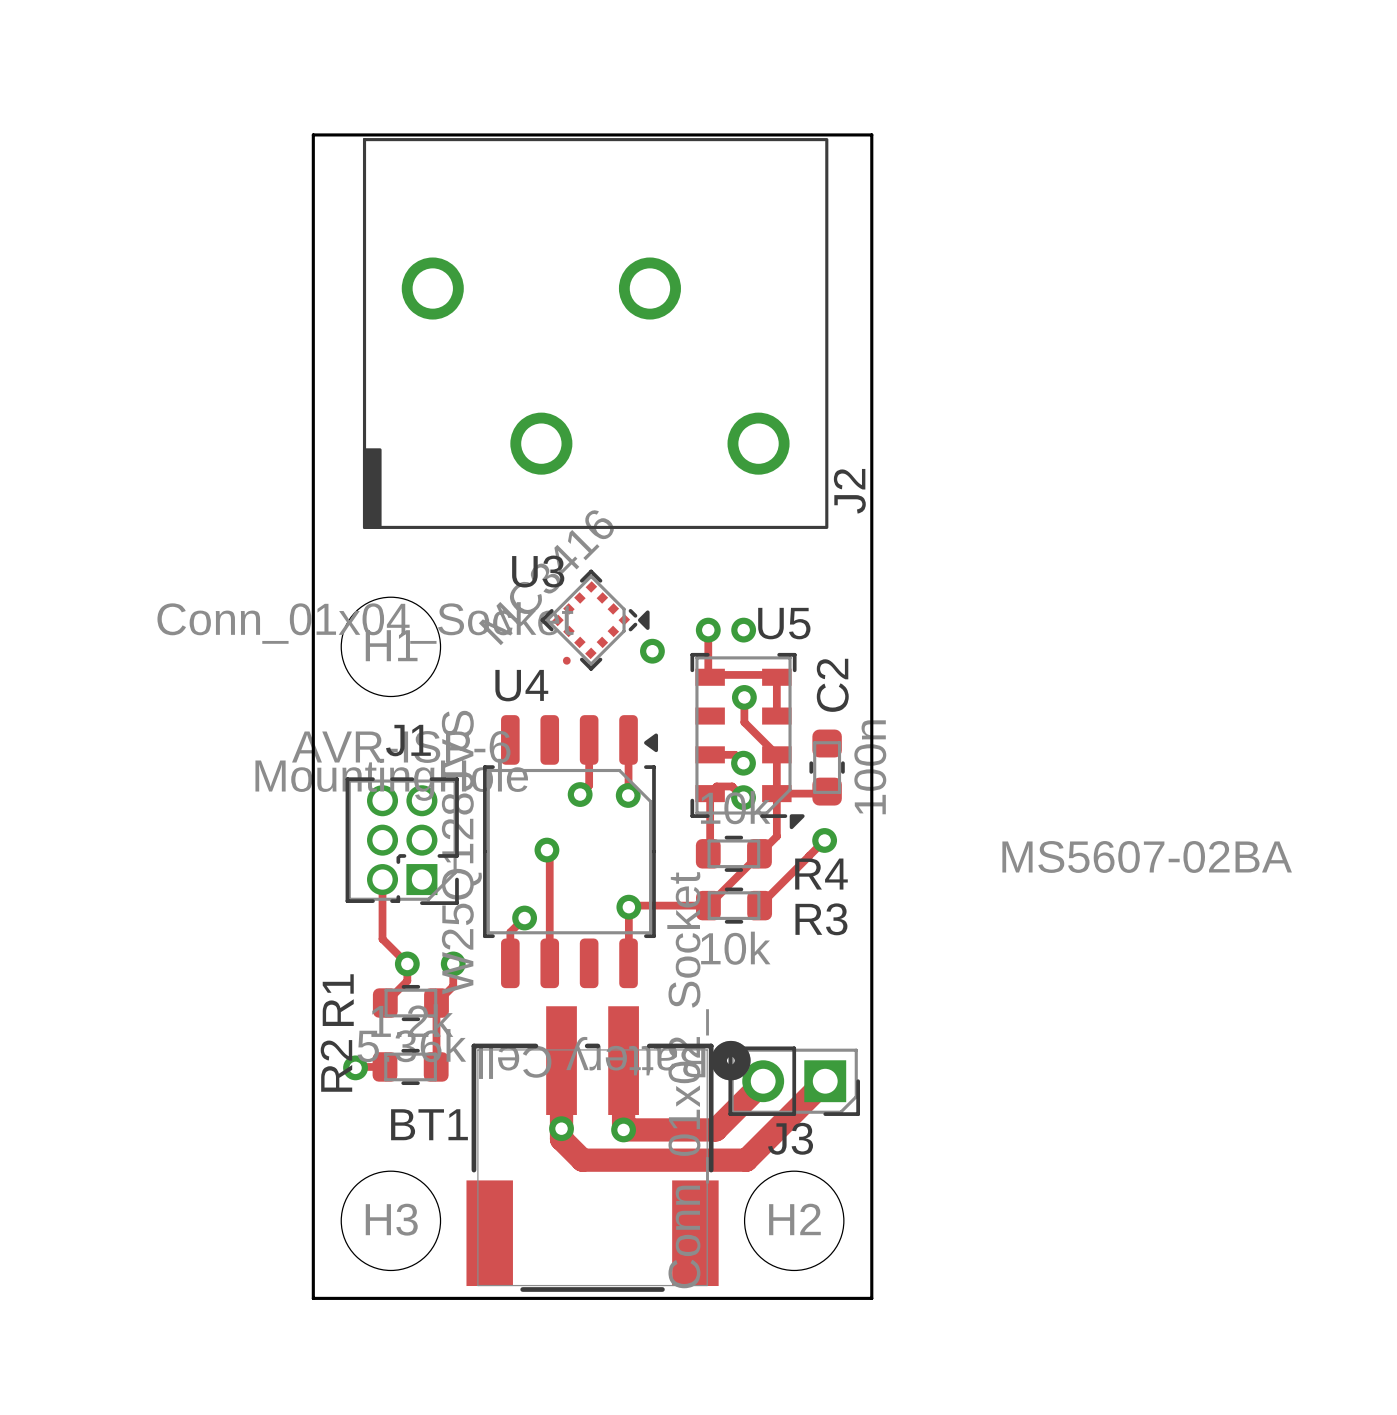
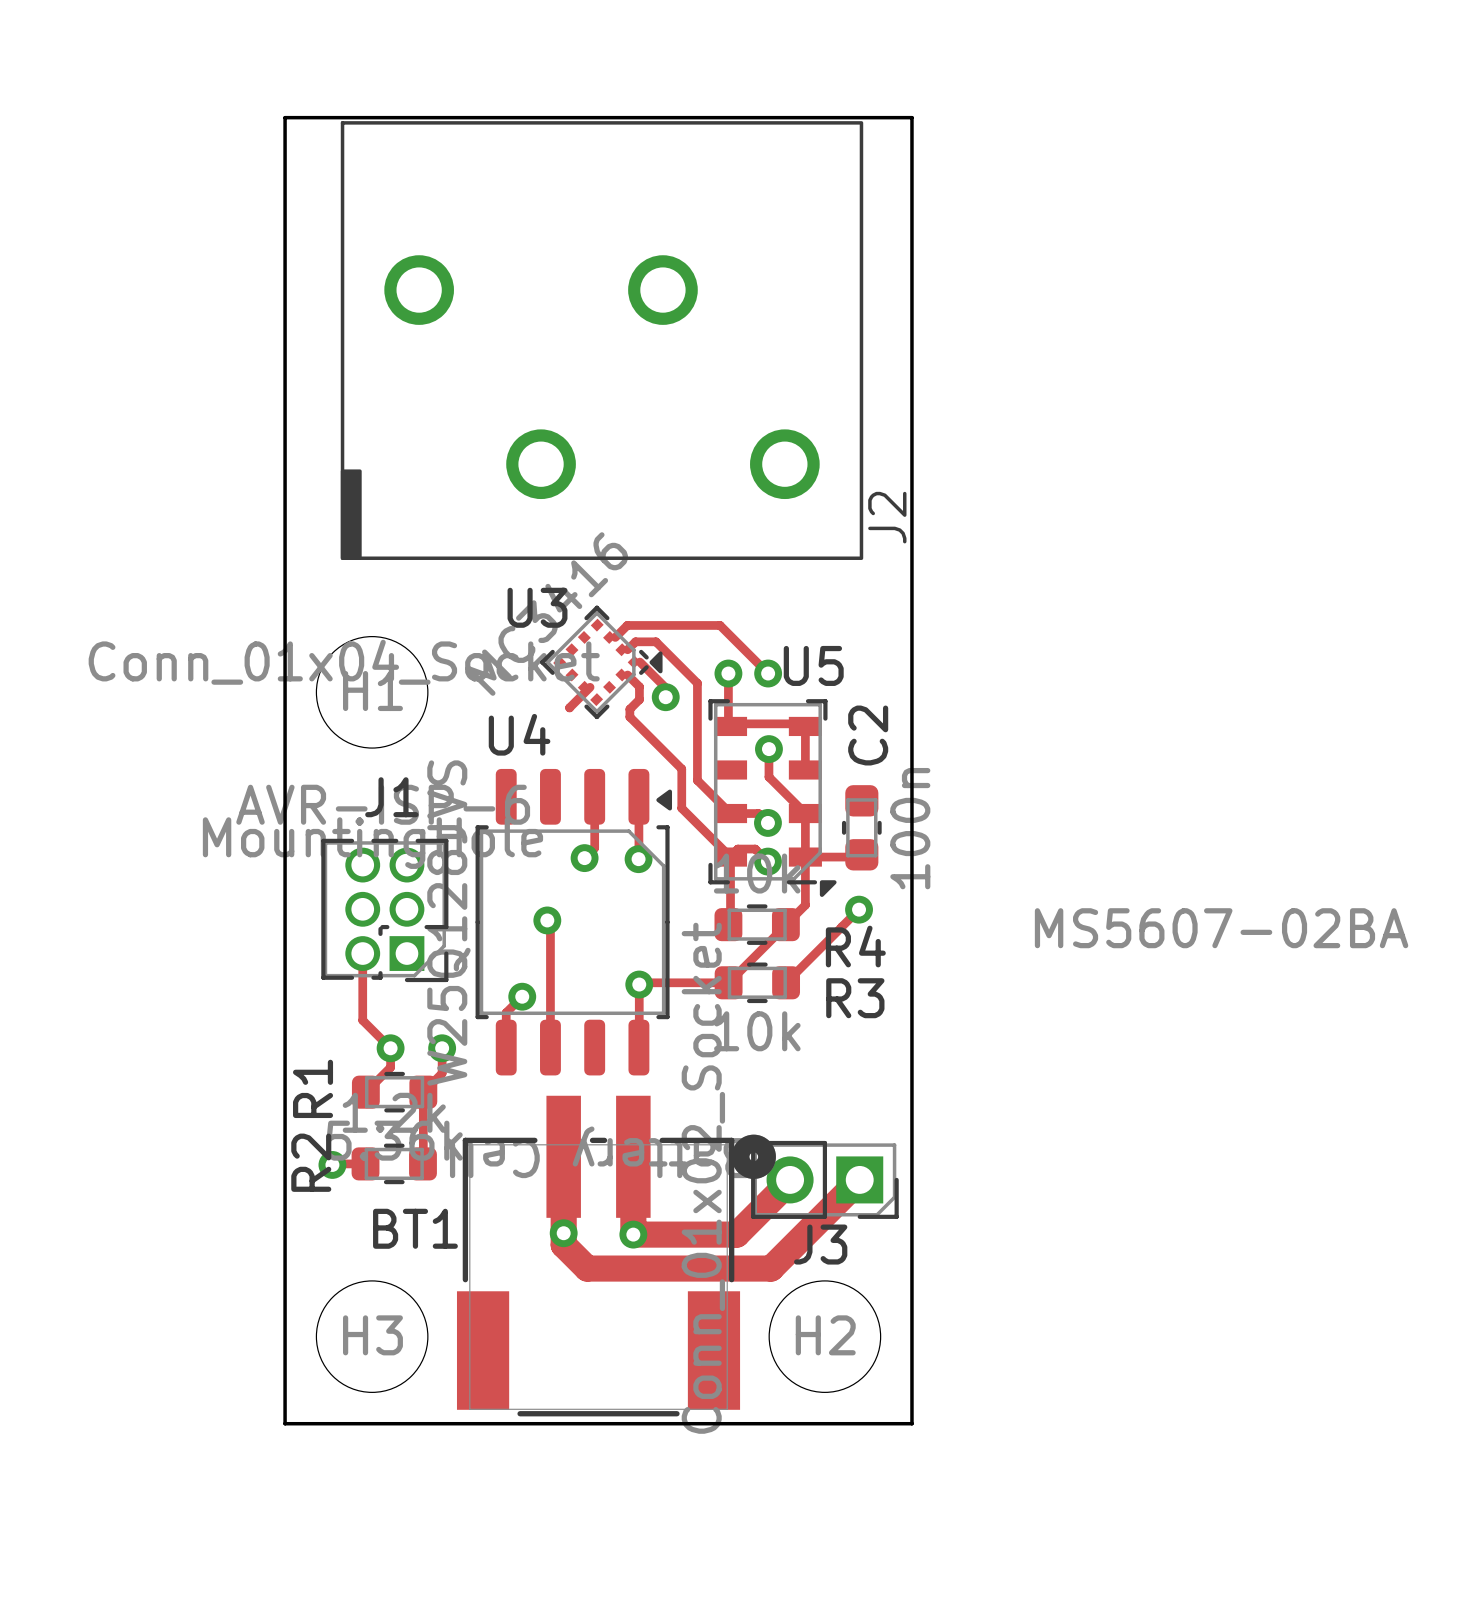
track: none -> (615, 637) (627, 625) (720, 625) (768, 673)
track: none -> (627, 649) (635, 641) (655, 641) (697, 683) (697, 780) (730, 813)
track: none -> (639, 662) (665, 687) (665, 697)
track: none -> (627, 674) (639, 686) (639, 699) (629, 709) (629, 717) (681, 768) (681, 808) (730, 857)
track: none -> (590, 687) (569, 707)

